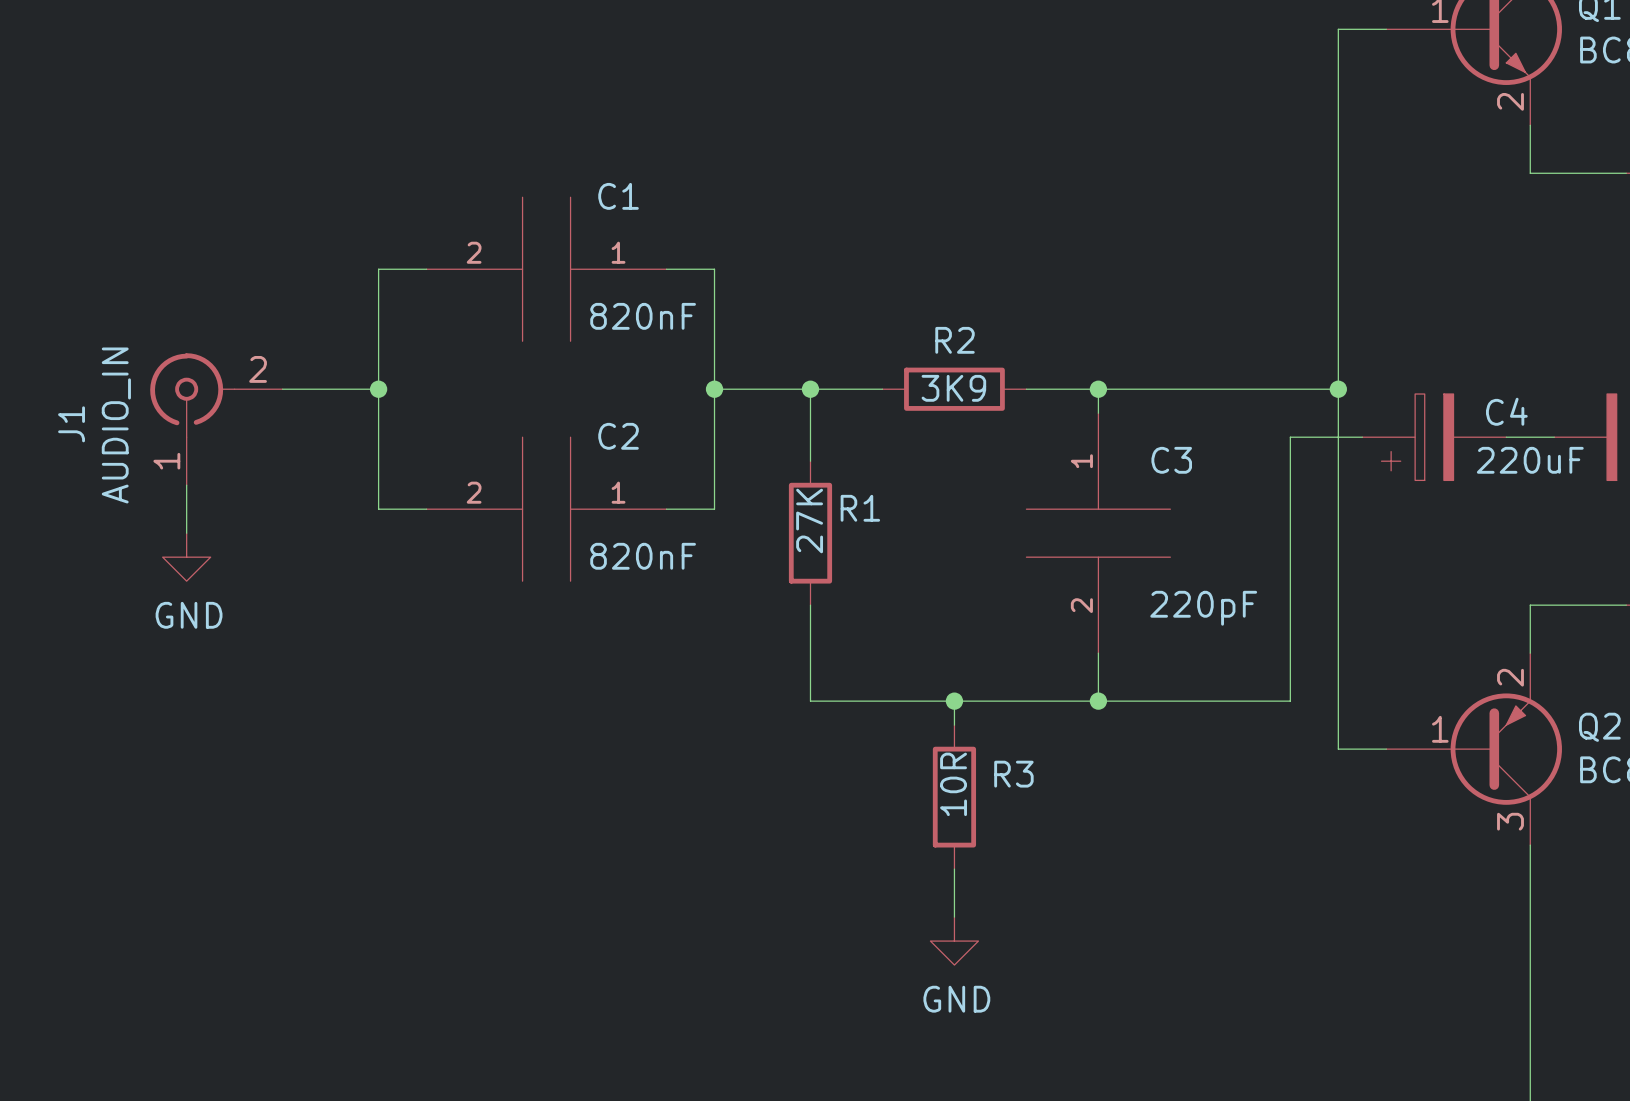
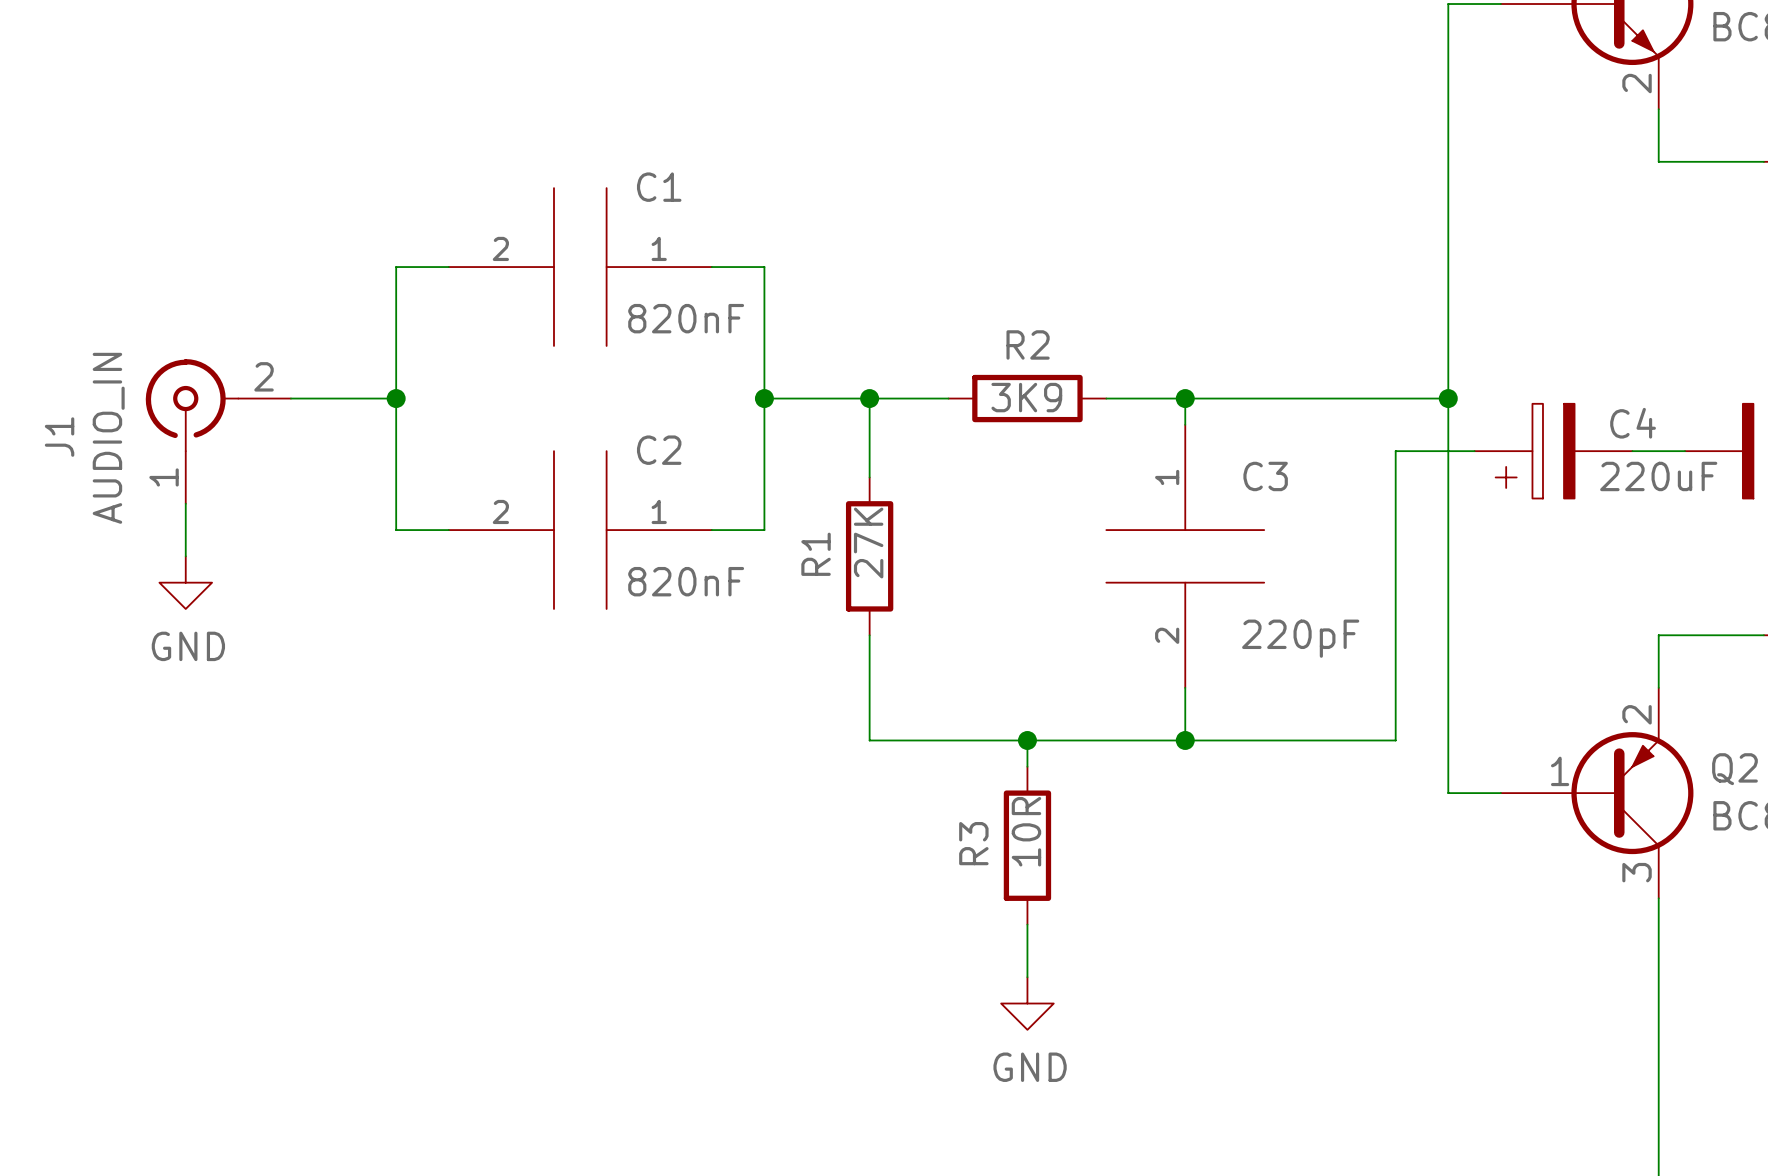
R1 name rotation: 0° (860, 508) -> 90° counterclockwise (816, 554)
R1 name position: R1 (860, 508) -> R1 (816, 554)
R3 name rotation: 0° (1013, 774) -> 90° counterclockwise (973, 843)
R3 name position: R3 (1013, 774) -> R3 (973, 843)

